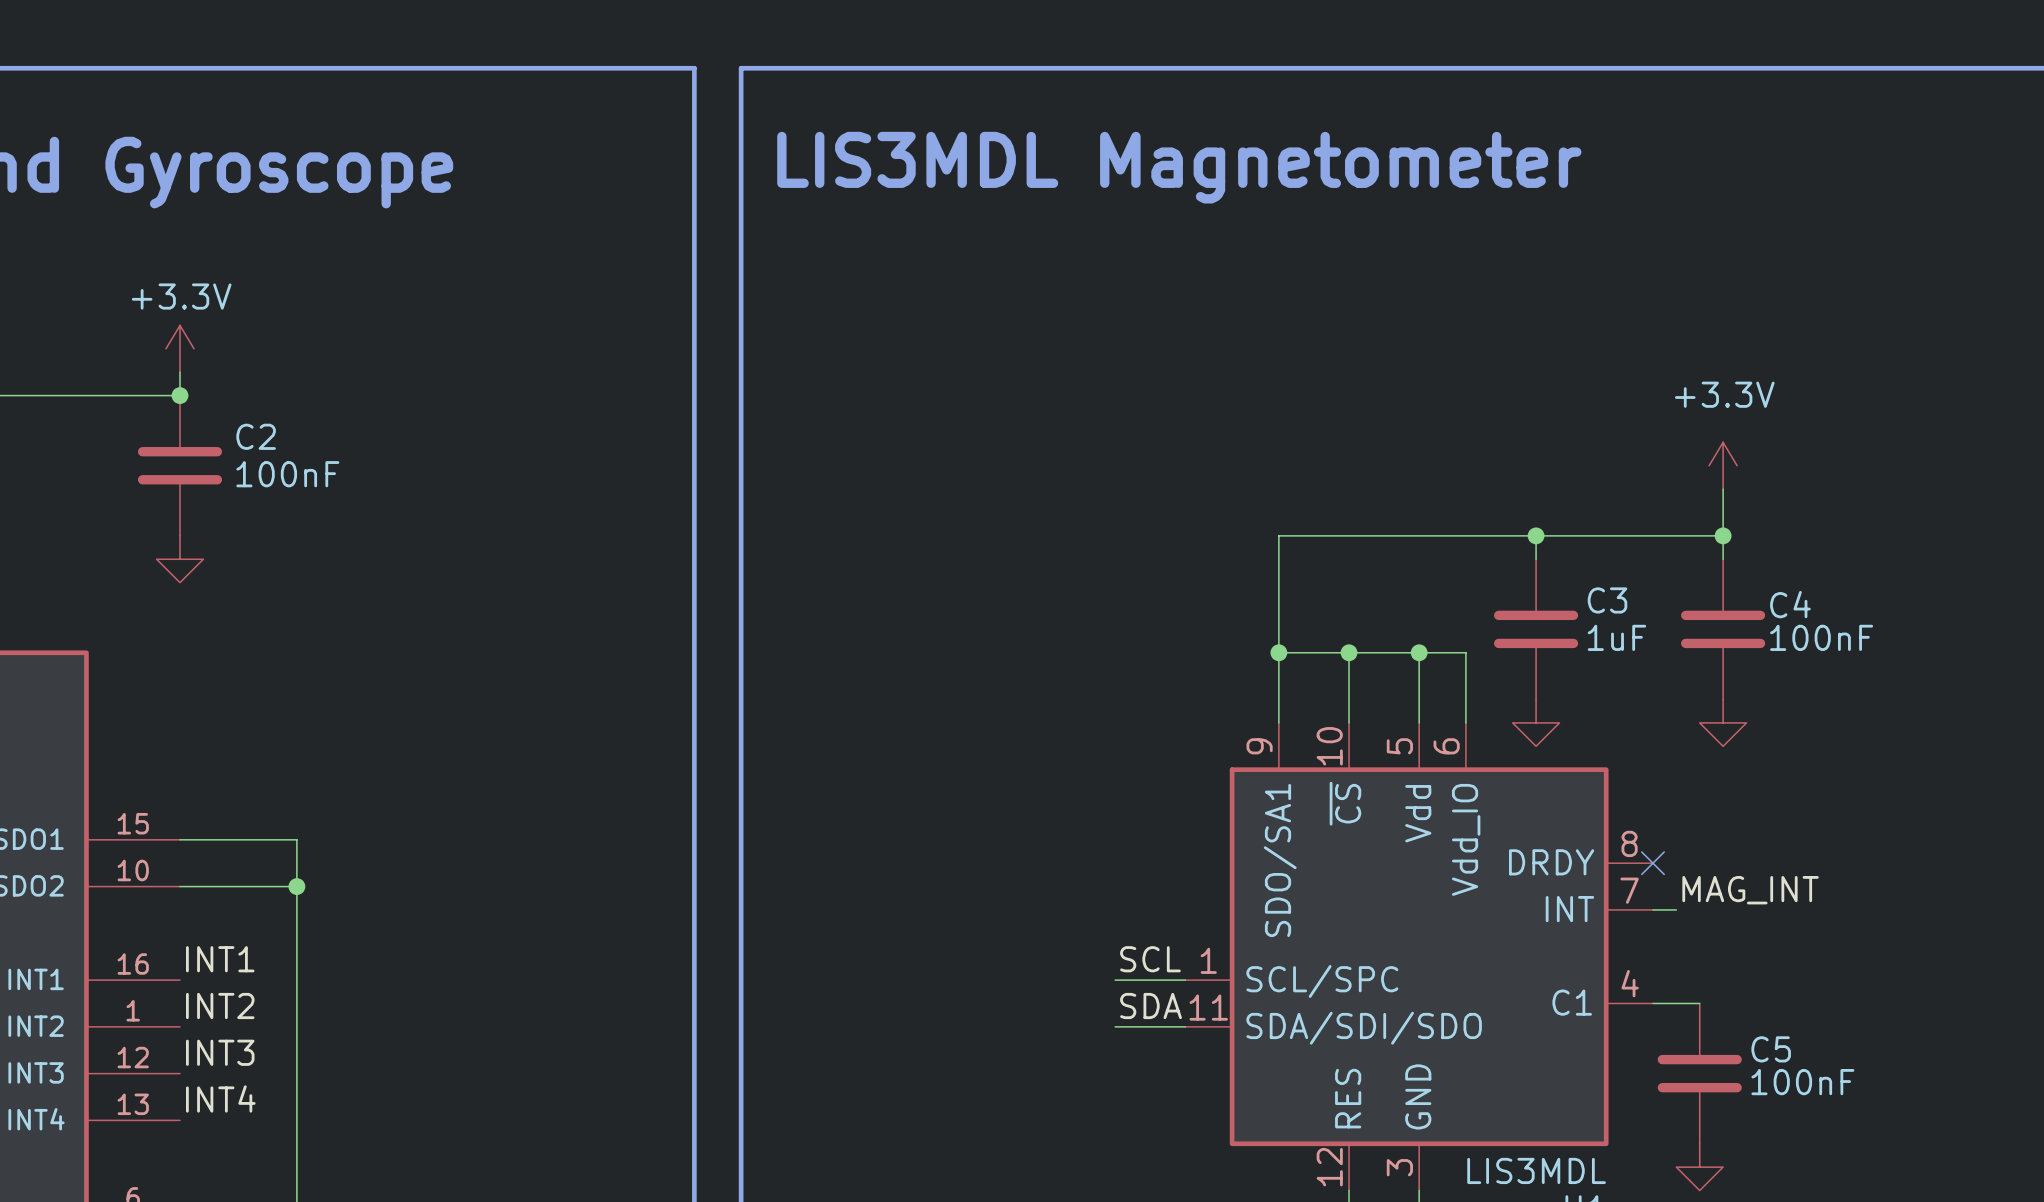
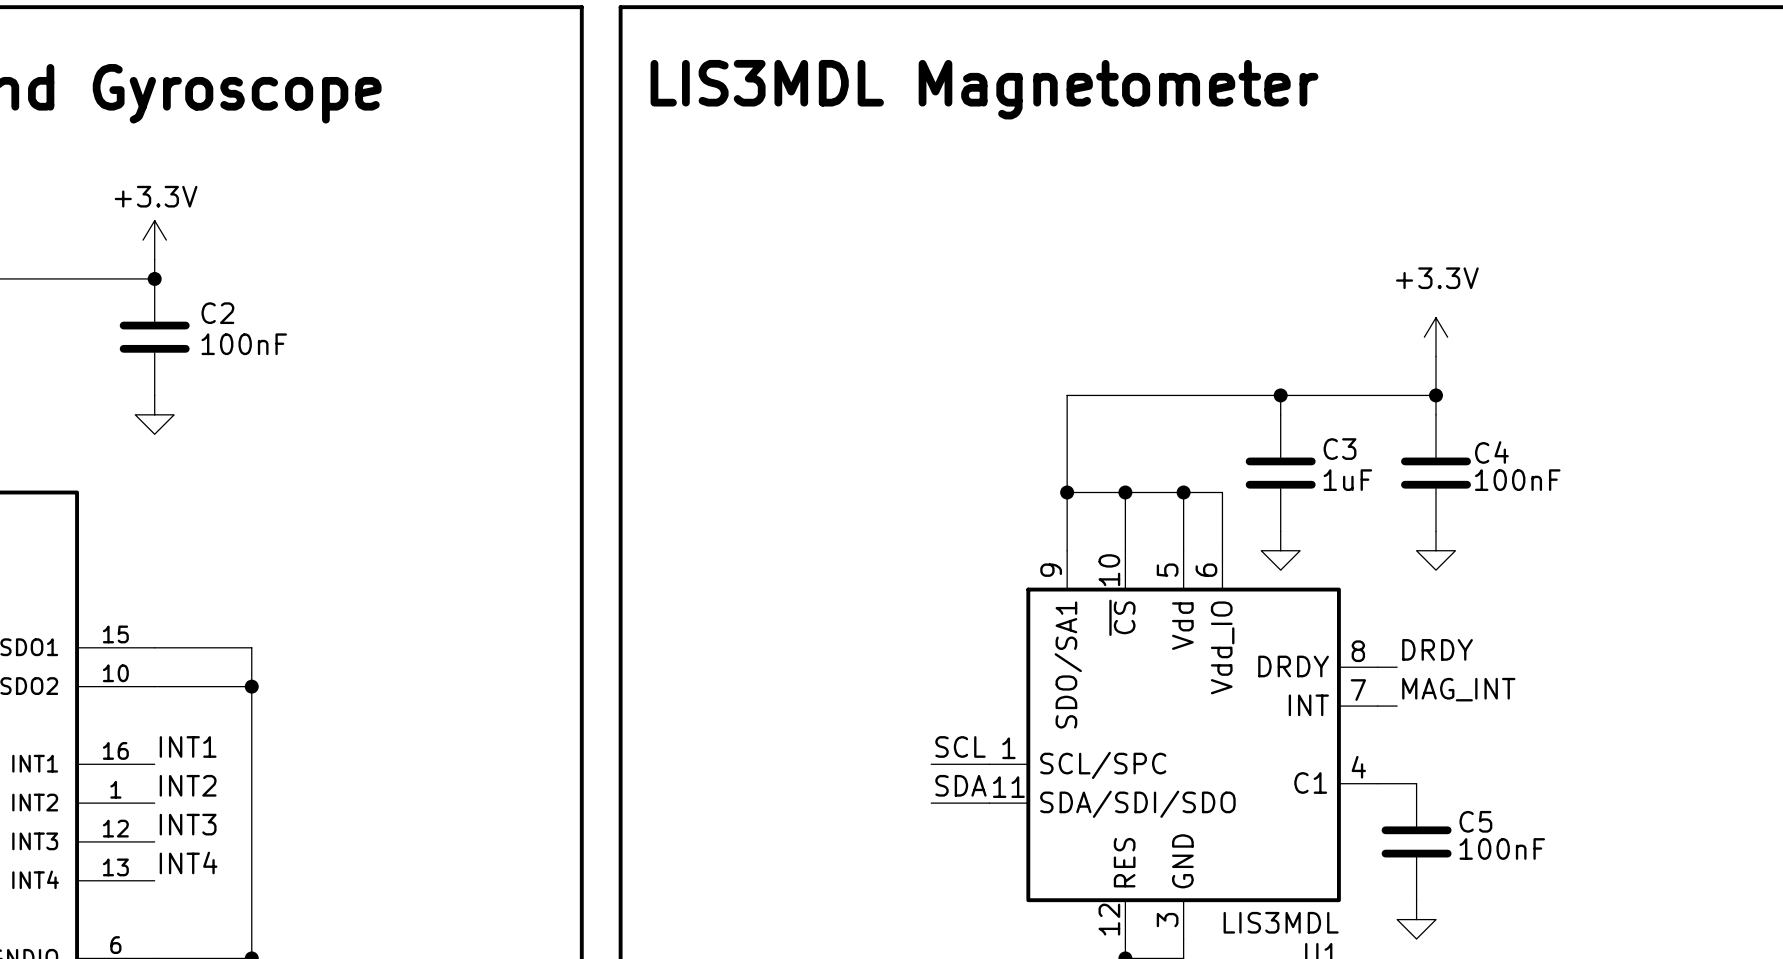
label: none -> DRDY (1437, 649)
wire: none -> (1377, 667) (1397, 667)
no-connect mark: (1652, 863) -> none

